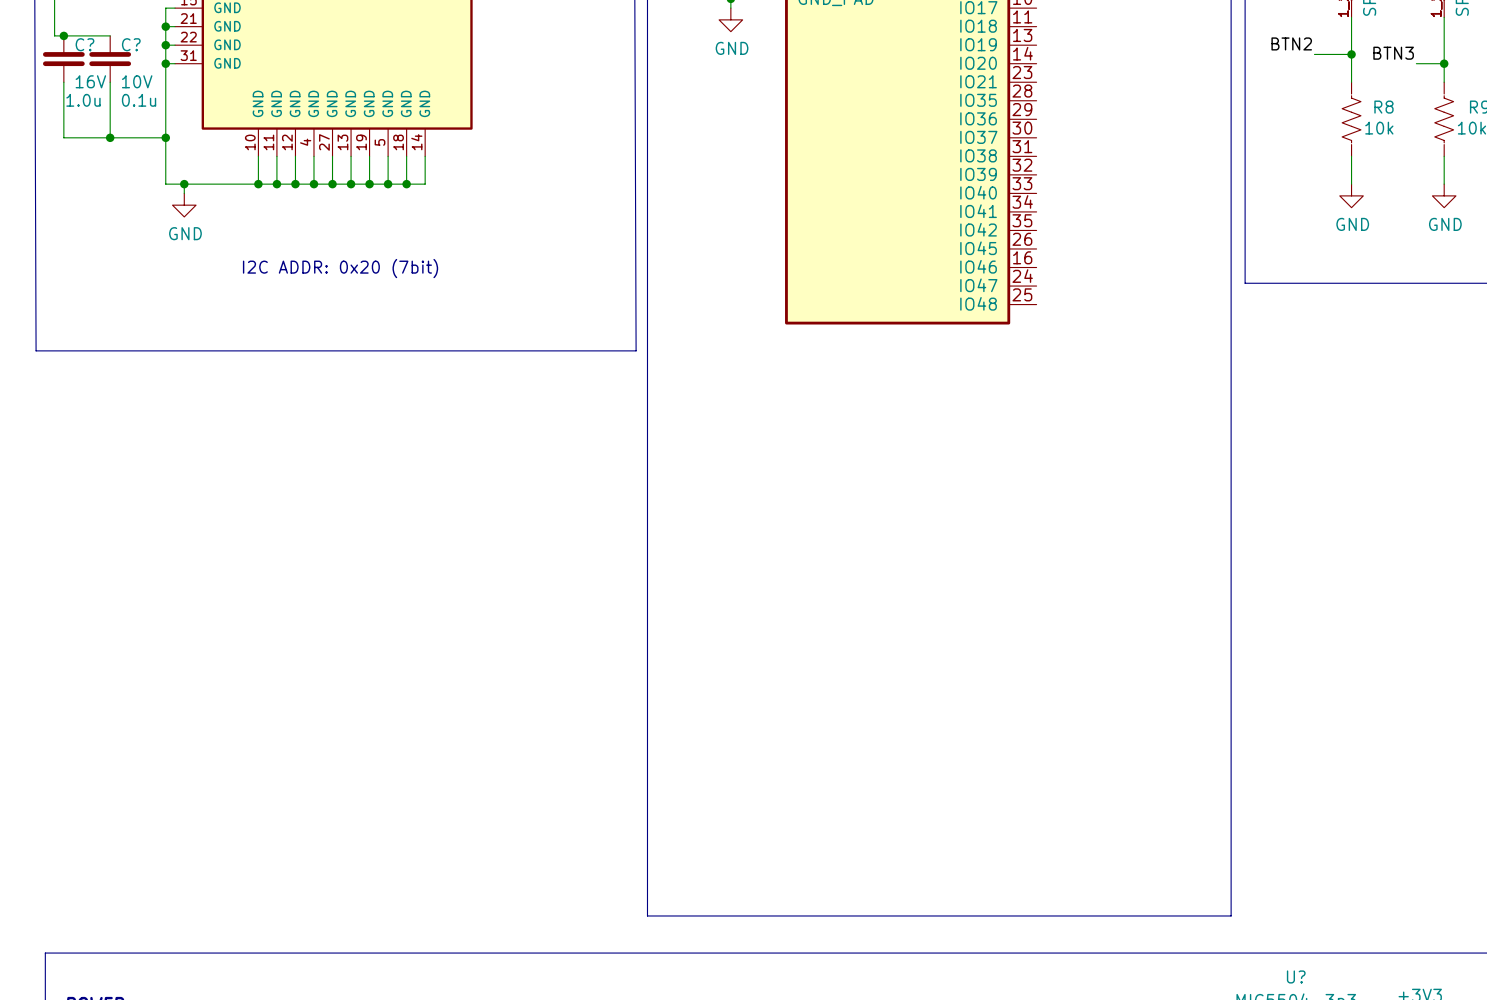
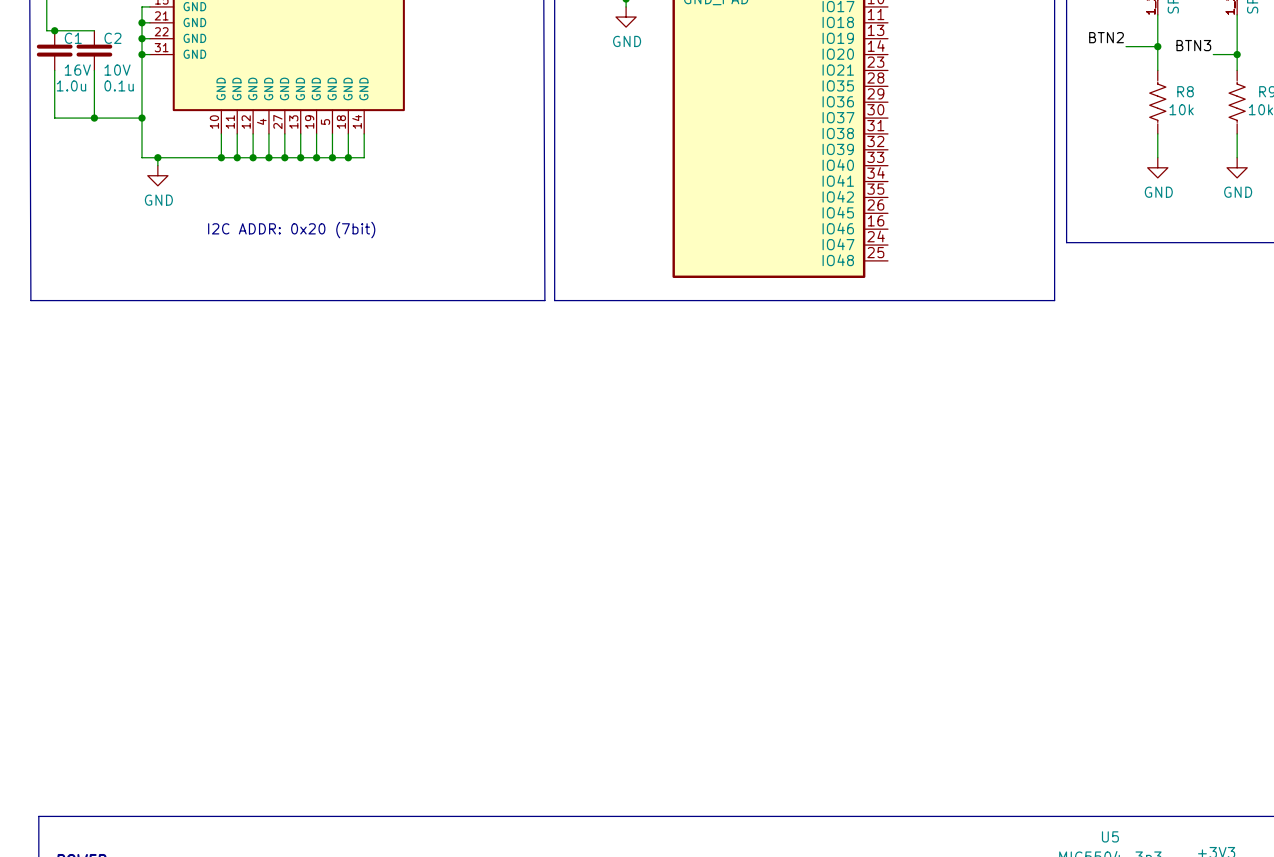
C? name: C? (84, 44) -> C1 (73, 38)
C? name: C? (131, 44) -> C2 (112, 38)
line: (647, 350) (647, 915) (1231, 915) (1231, 350) -> (554, 300) (1054, 300)
U? name: U? (1296, 976) -> U5 (1110, 836)

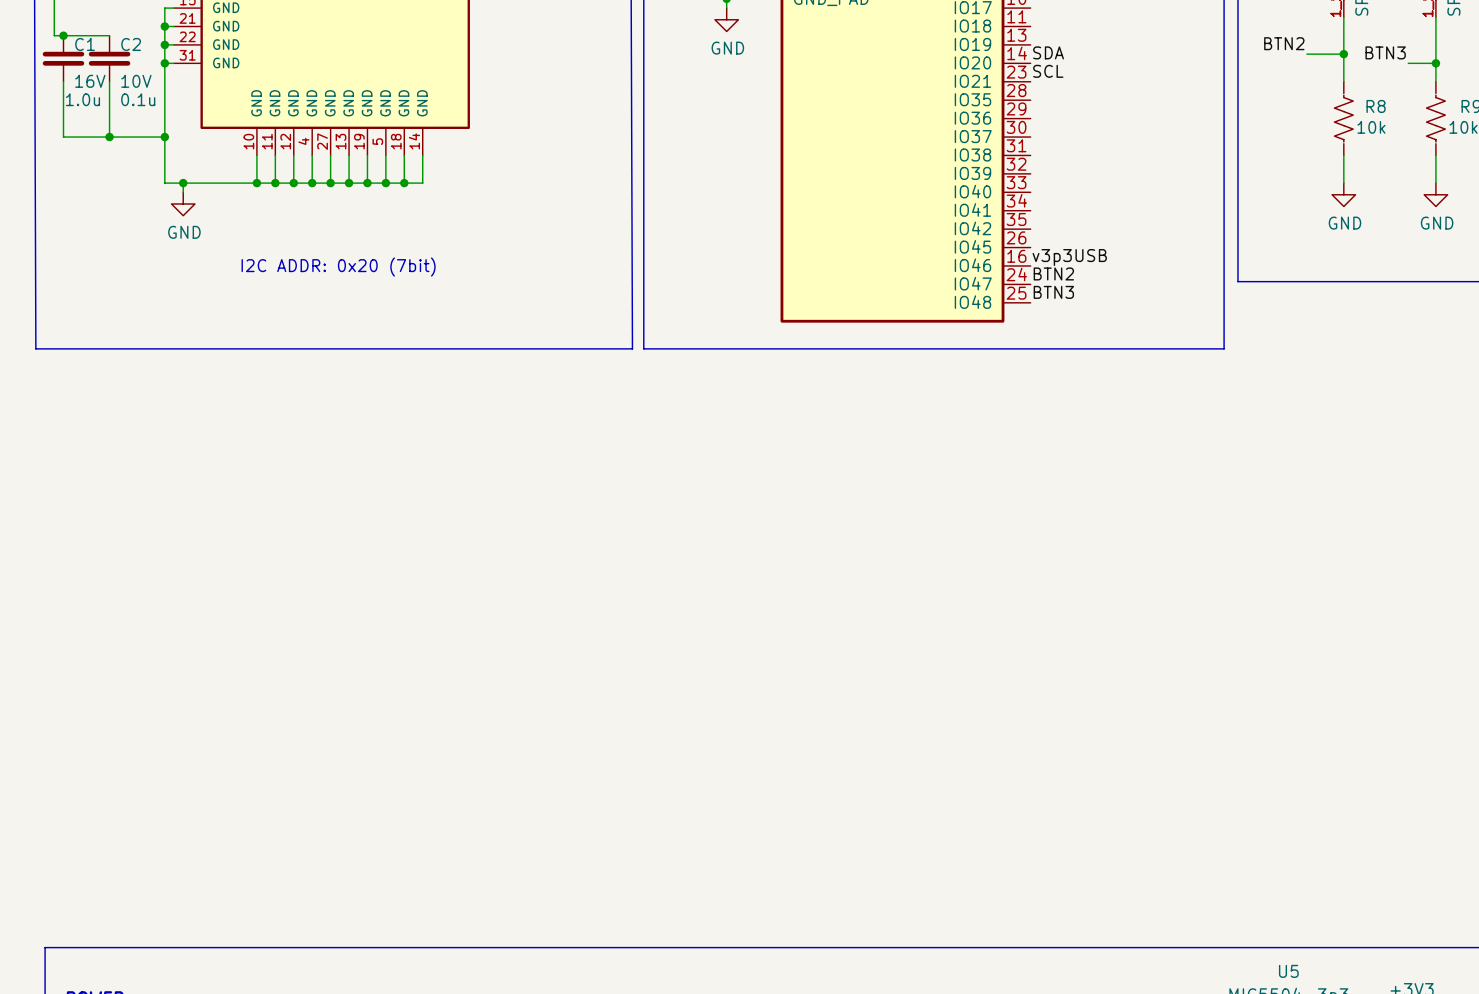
label: none -> SDA (1048, 52)
label: none -> SCL (1048, 71)
label: none -> v3p3USB (1069, 257)
label: none -> BTN2 (1053, 273)
label: none -> BTN3 (1053, 292)

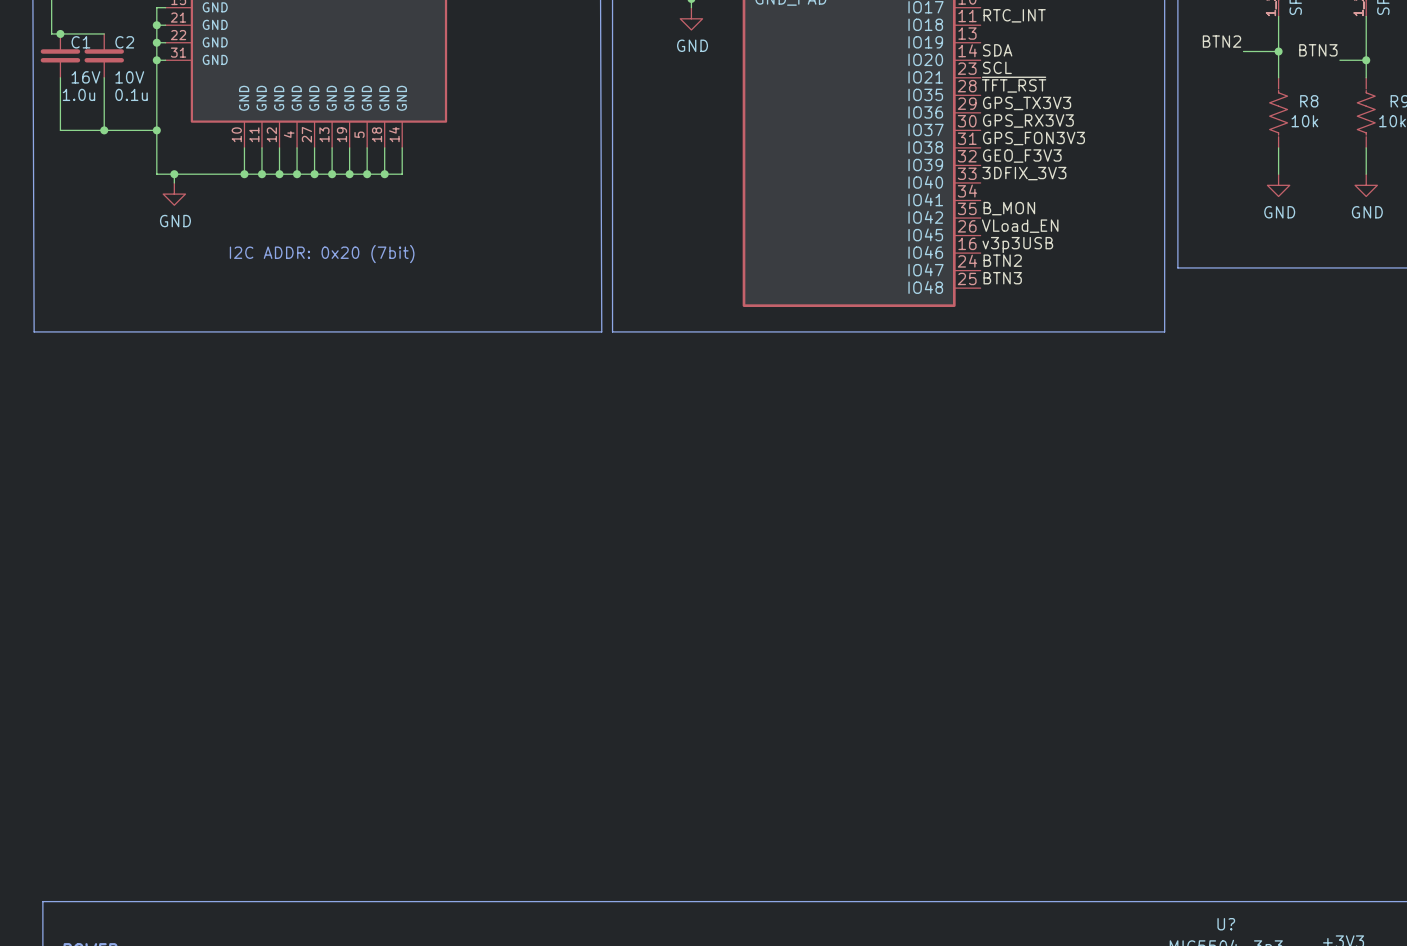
label: none -> RTC_INT (1014, 15)
label: none -> ~{TFT_RST} (1014, 84)
label: none -> GPS_TX3V3 (1027, 103)
label: none -> GPS_RX3V3 (1028, 120)
label: none -> GPS_FON3V3 (1033, 138)
label: none -> GEO_F3V3 (1022, 156)
label: none -> 3DFIX_3V3 (1024, 173)
label: none -> B_MON (1009, 208)
label: none -> VLoad_EN (1020, 226)
U5 name: U5 (1288, 971) -> U? (1226, 924)

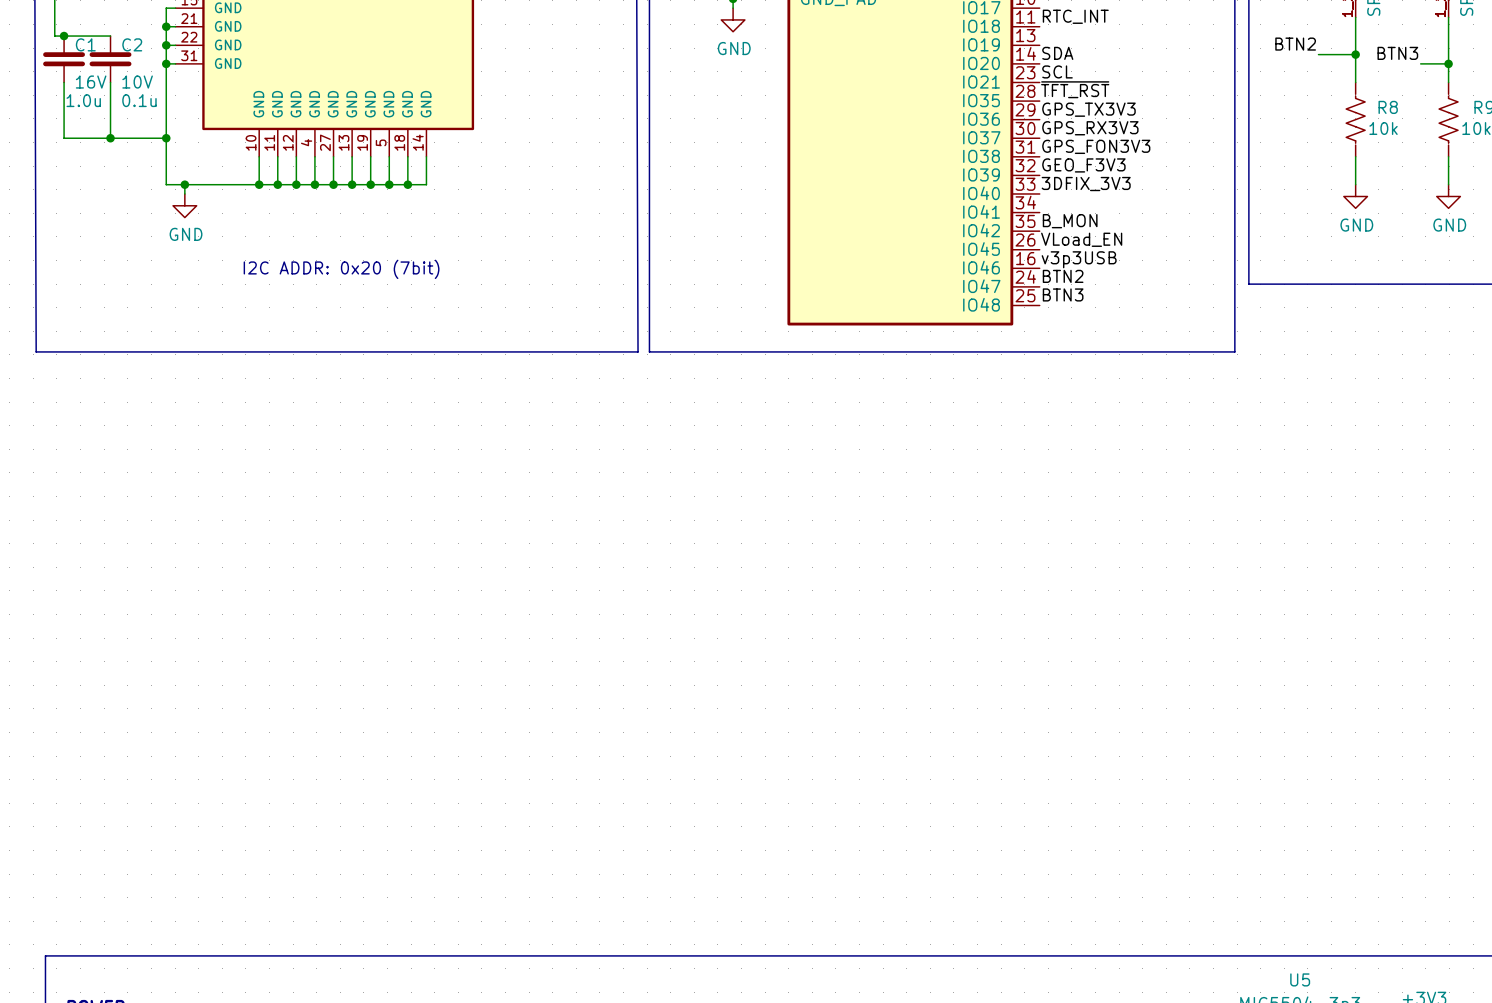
U? name: U? (1226, 924) -> U5 (1300, 979)

